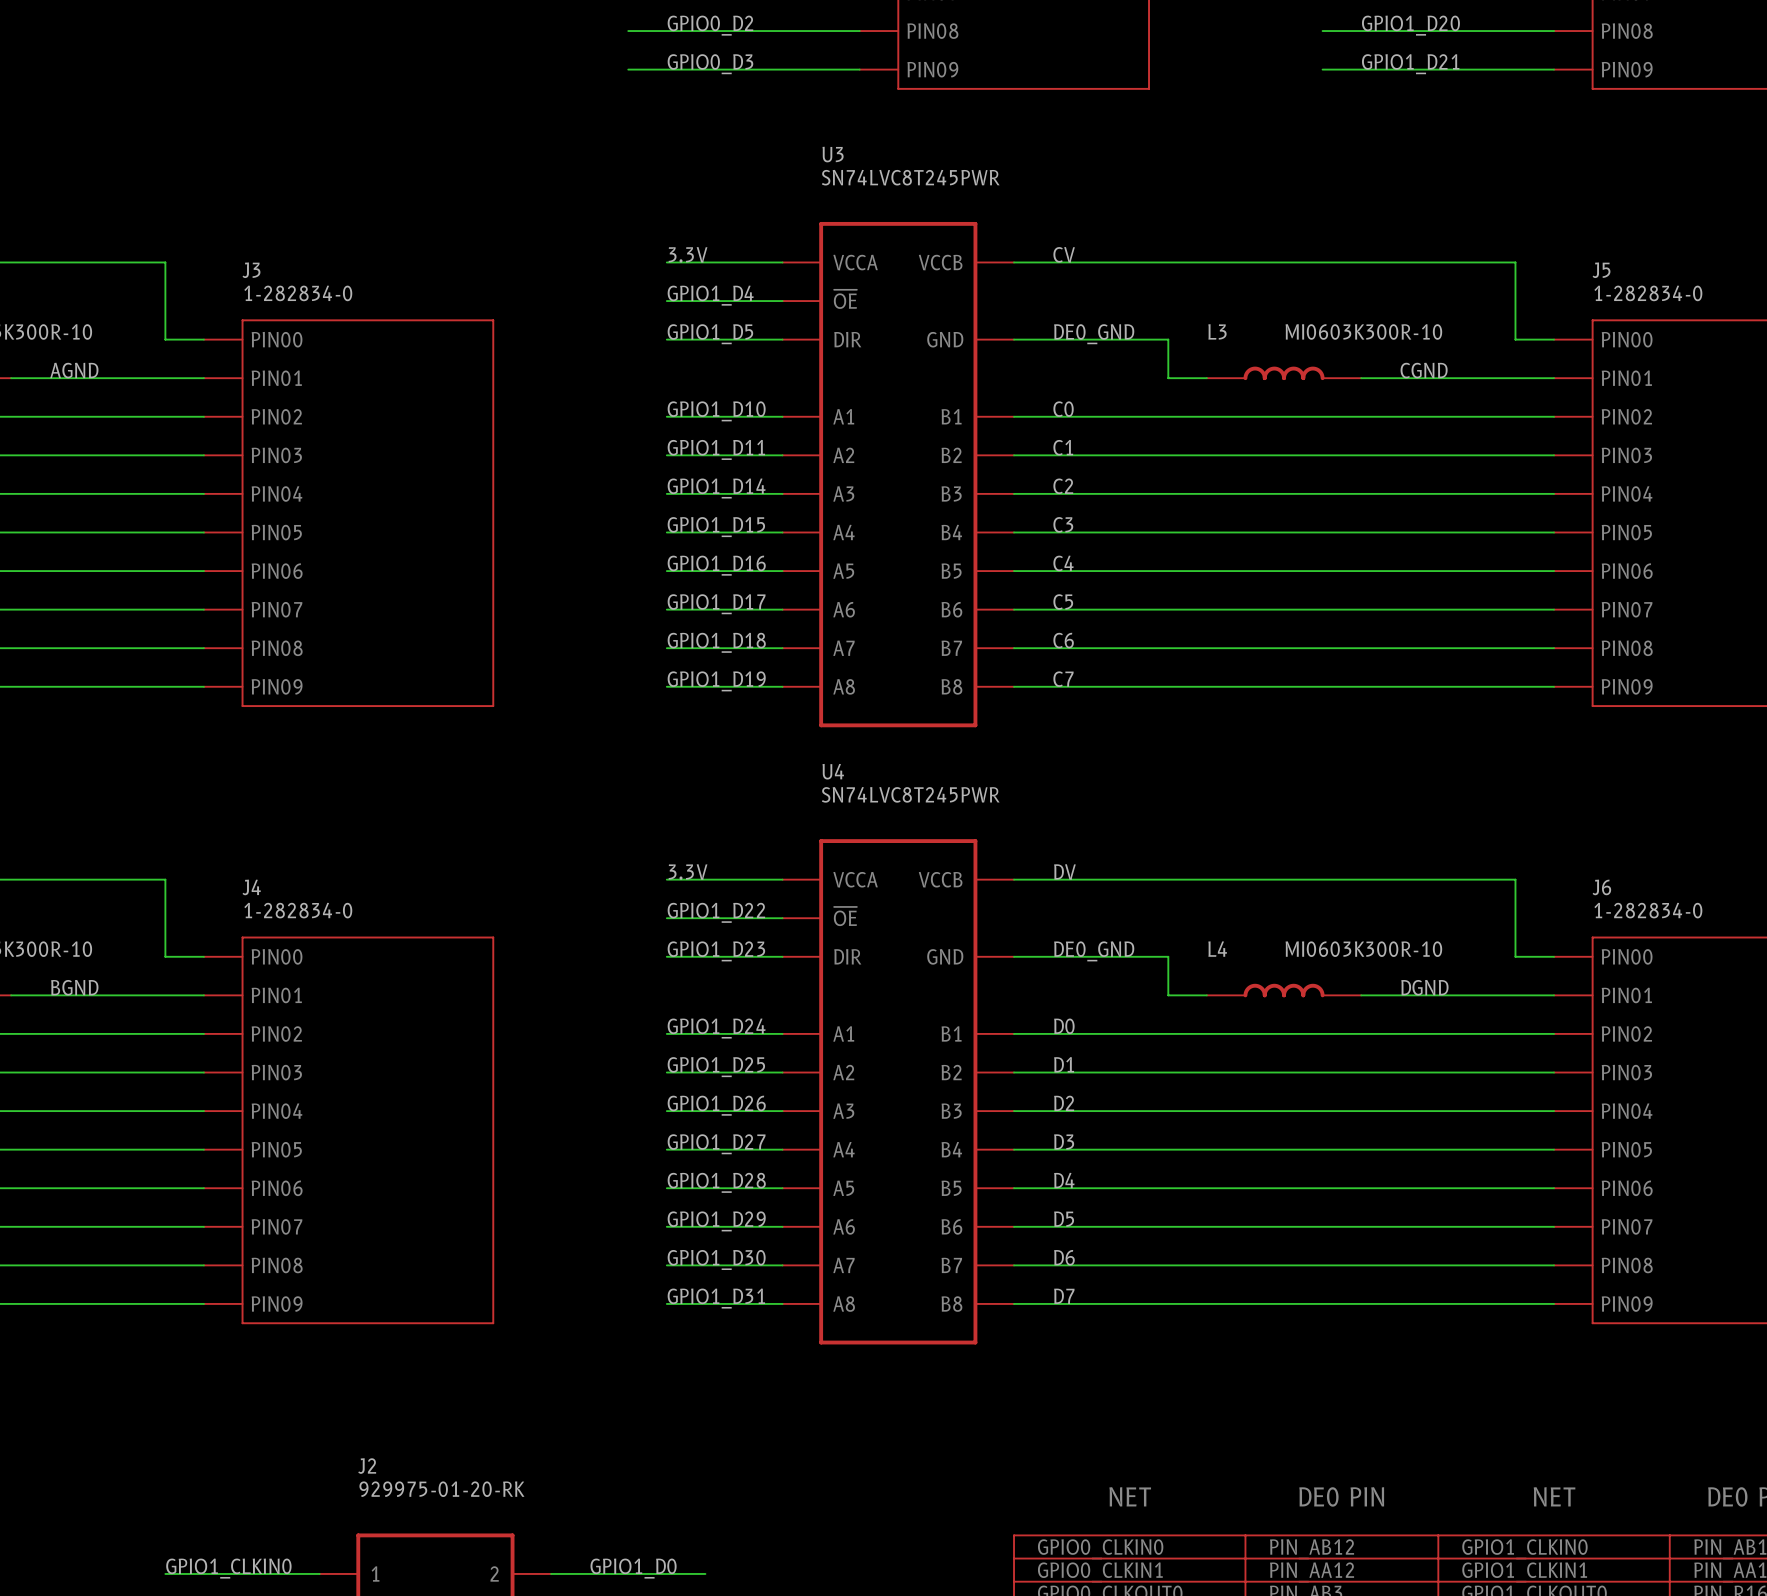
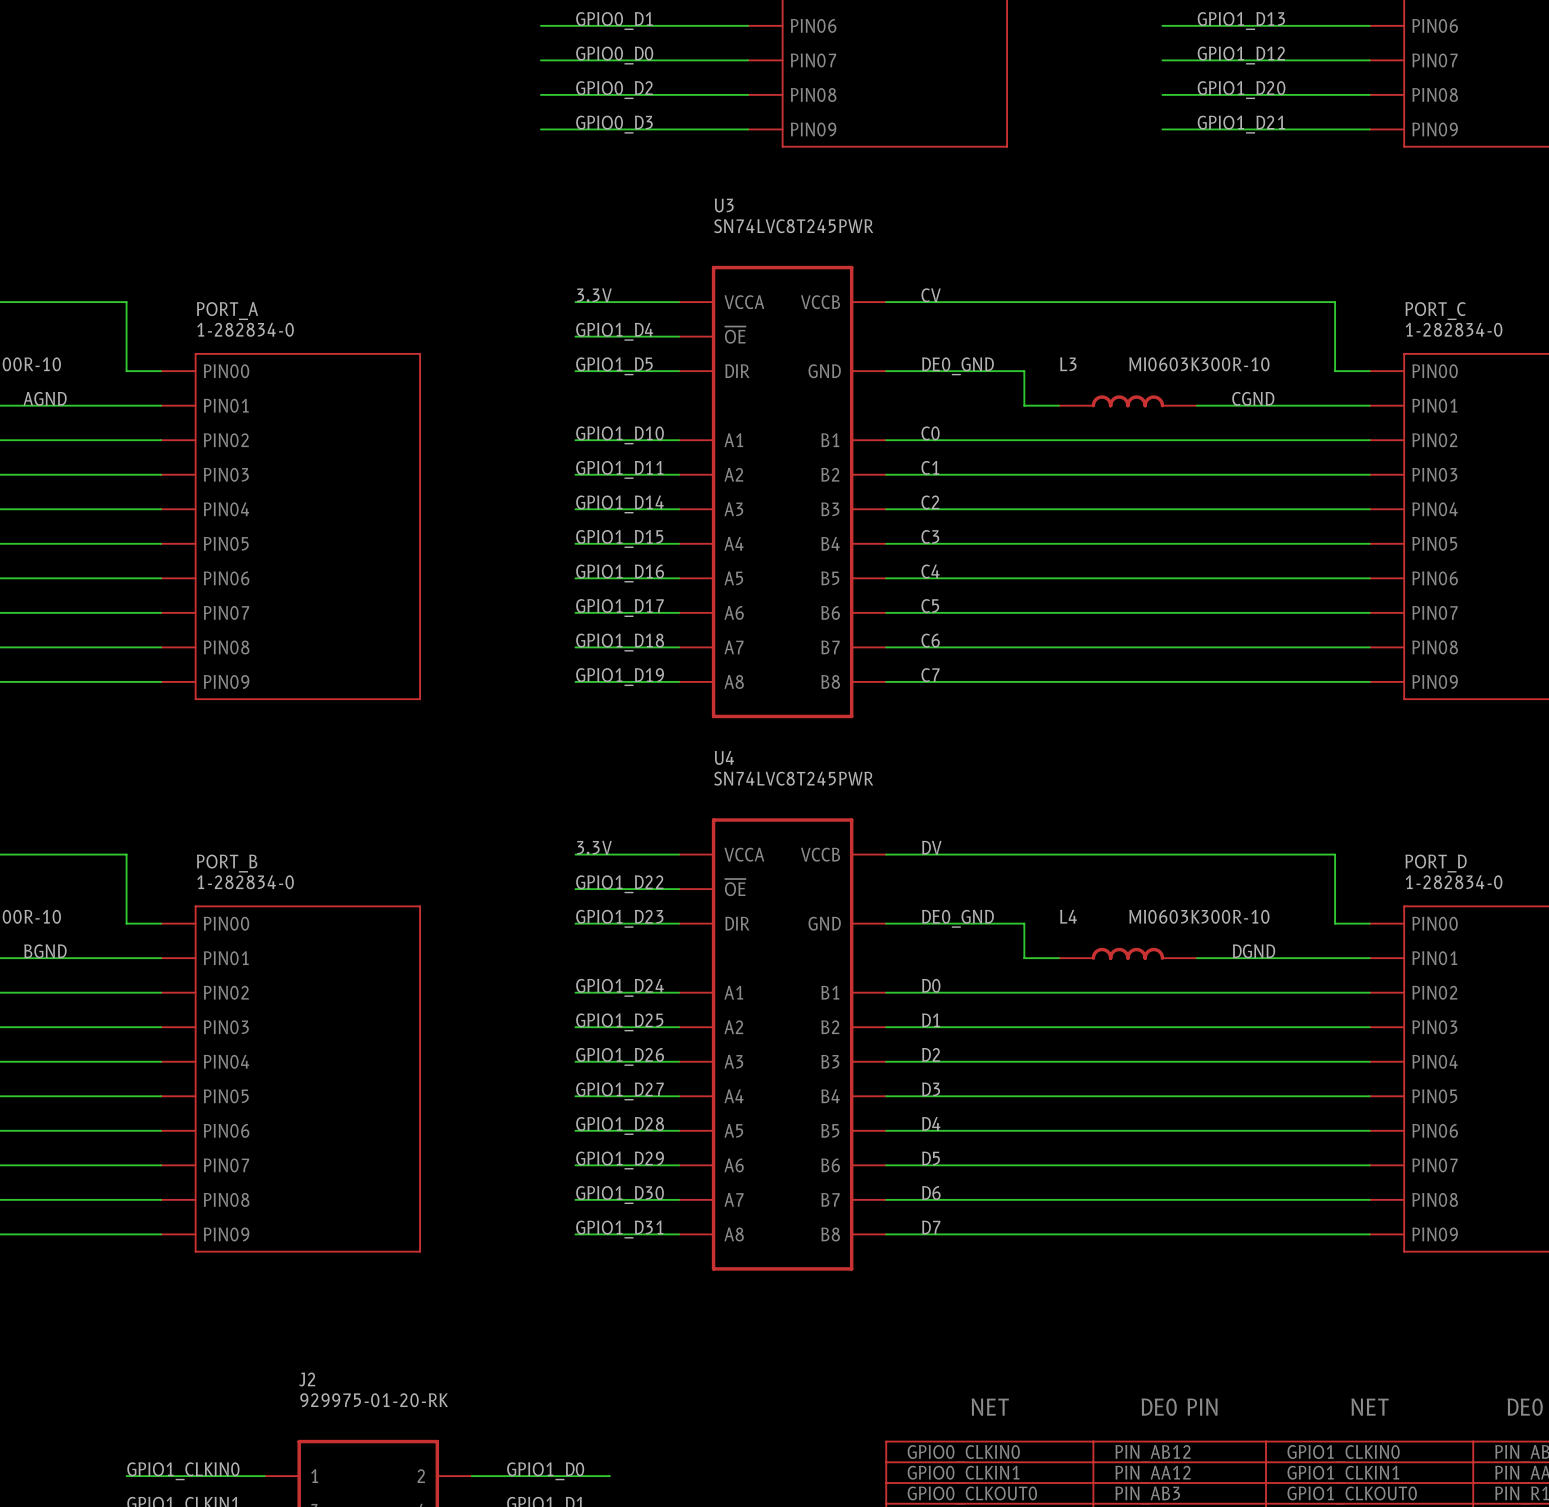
J3 name: J3 (251, 270) -> PORT_A (227, 311)
J5 name: J5 (1601, 270) -> PORT_C (1435, 311)
J4 name: J4 (251, 887) -> PORT_B (227, 863)
J6 name: J6 (1601, 887) -> PORT_D (1436, 863)

